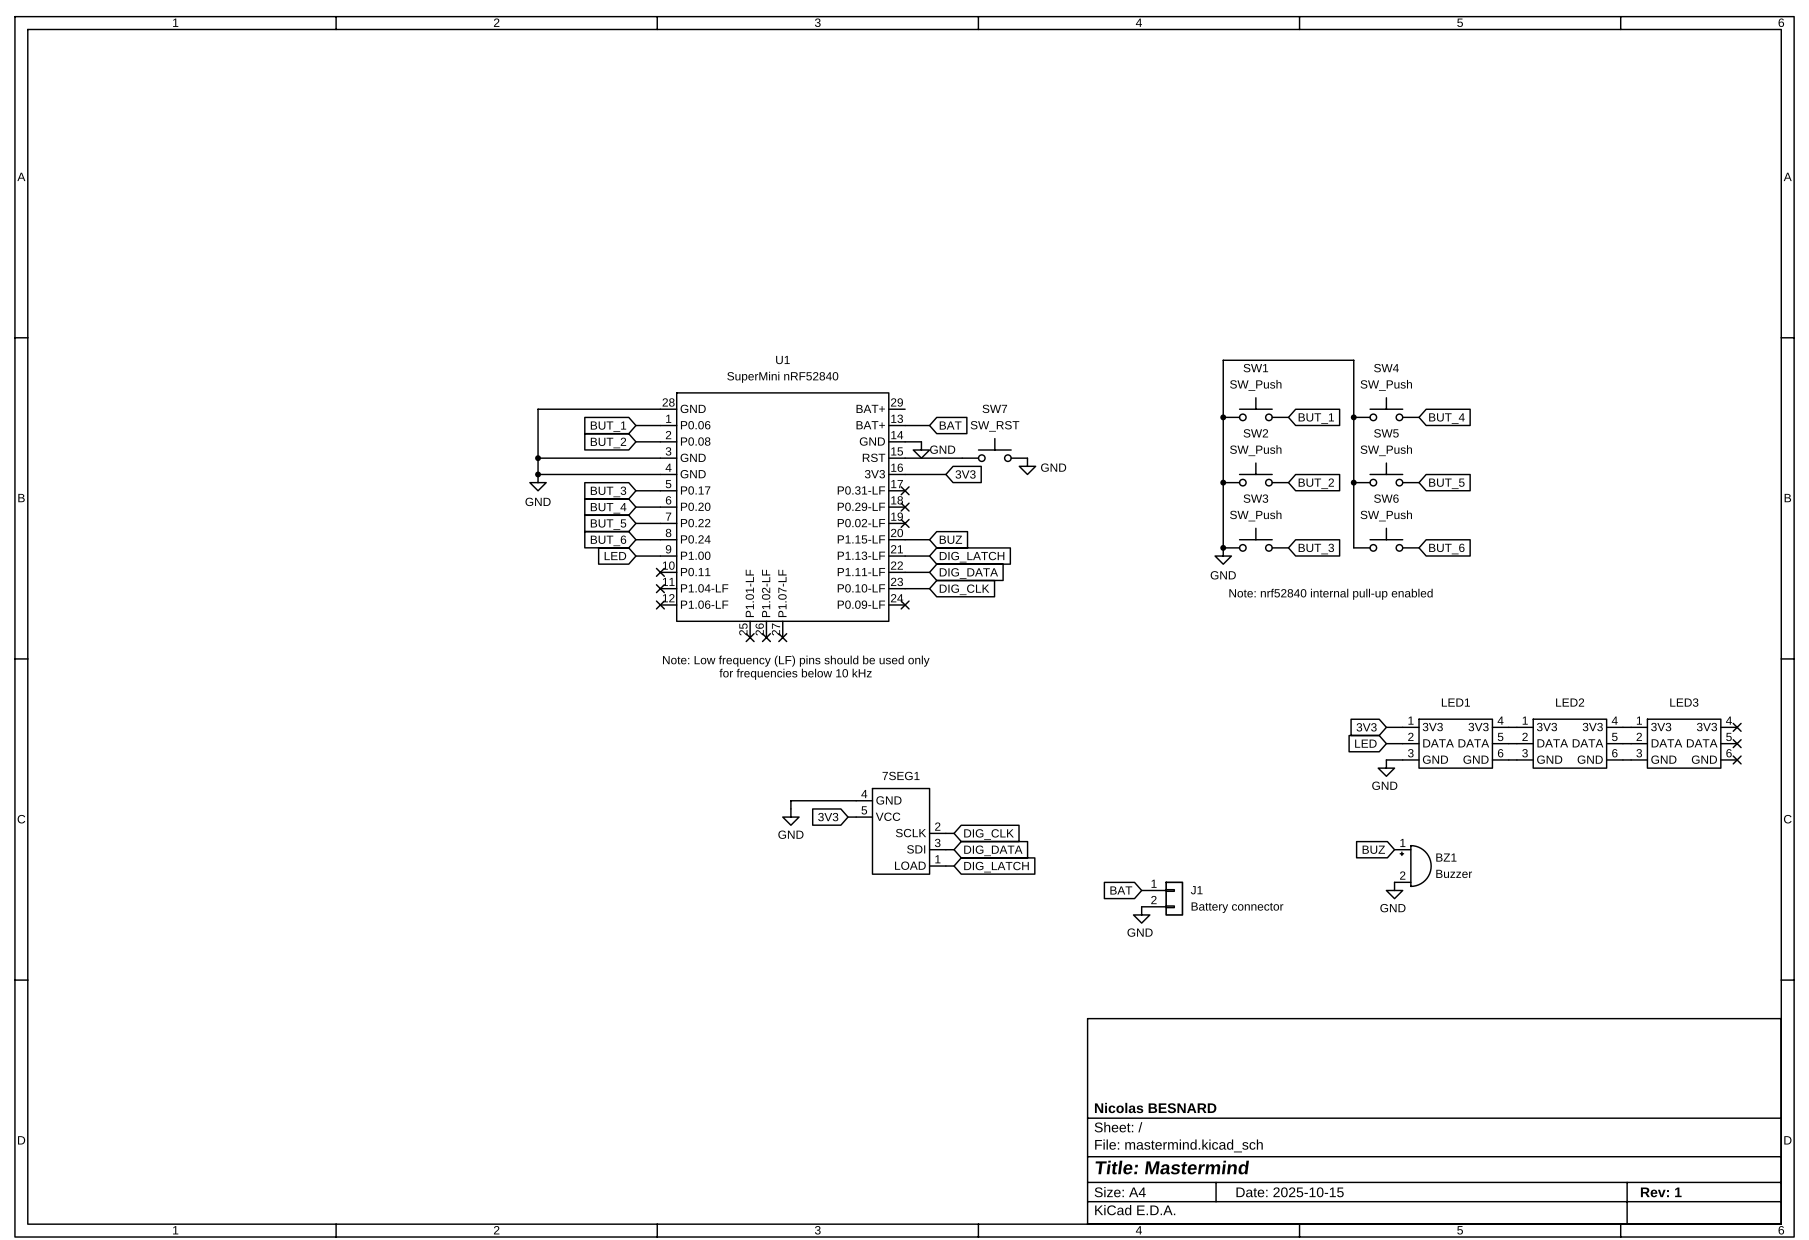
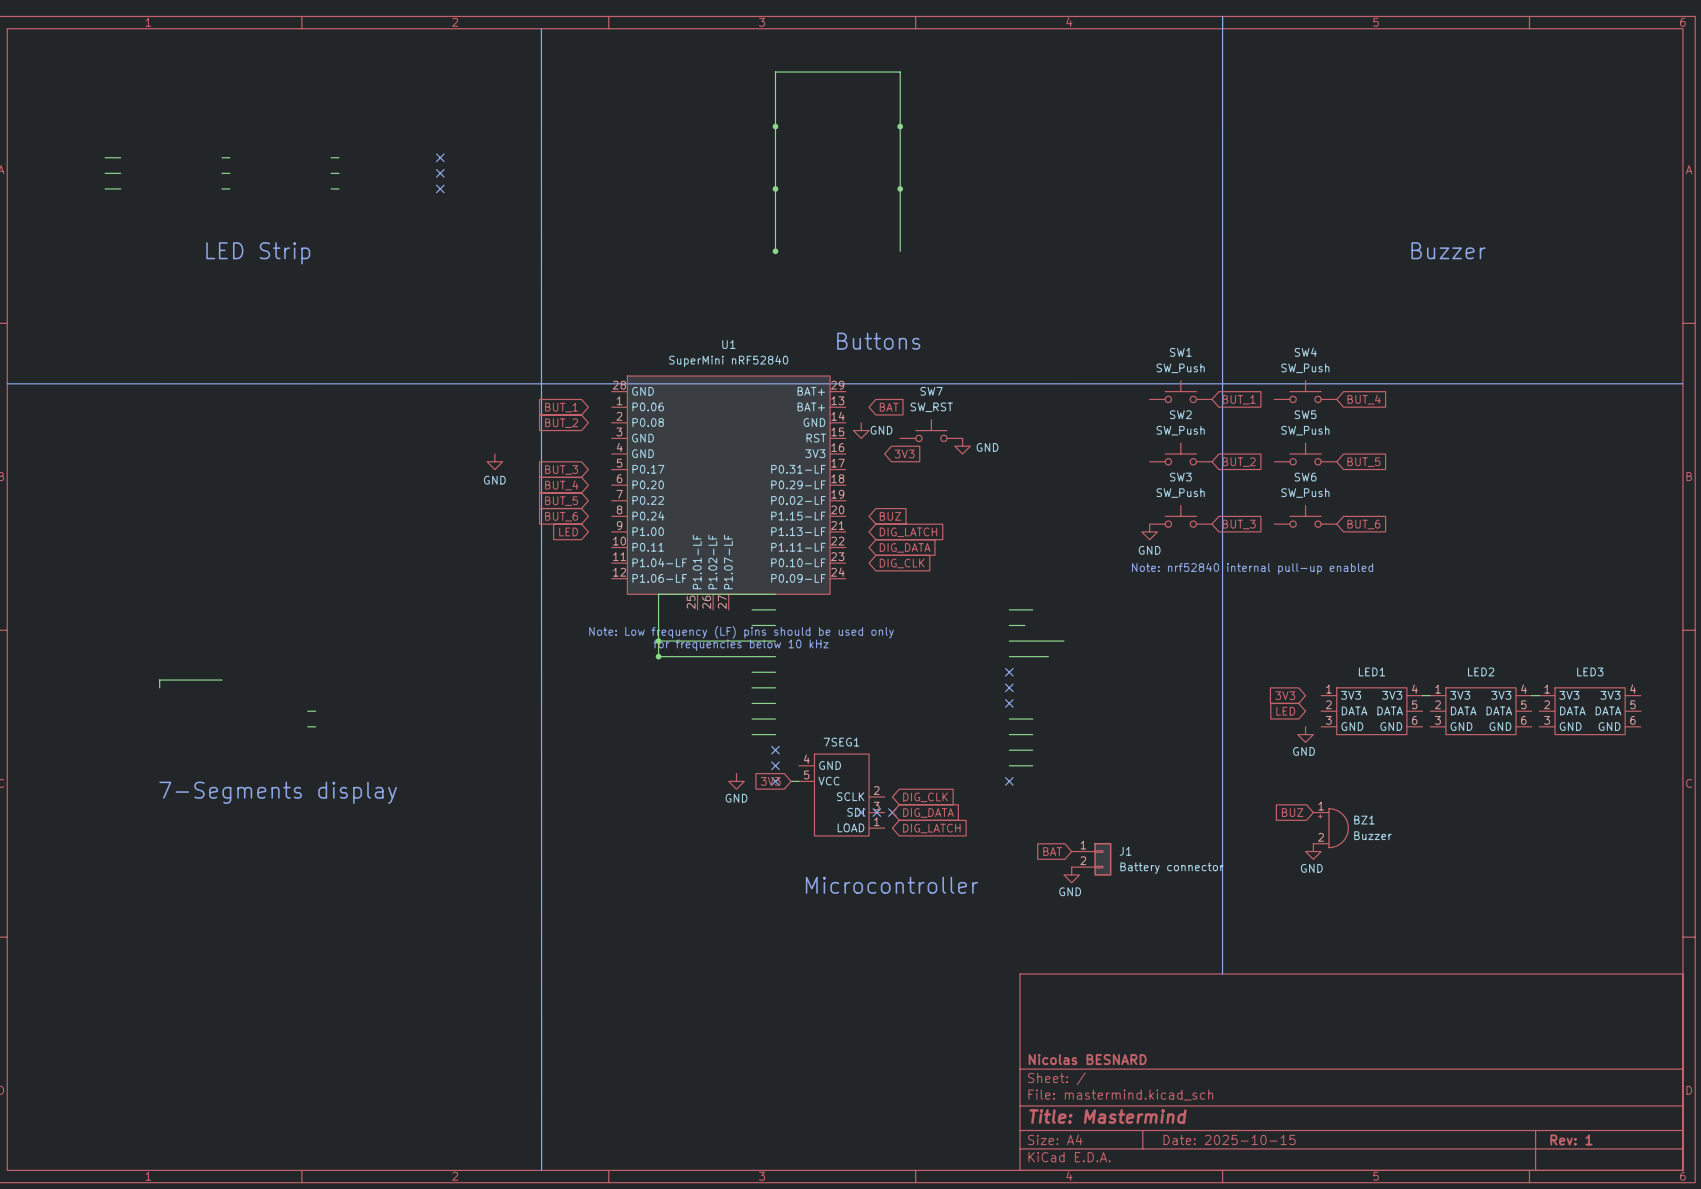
line: none -> (1222, 16) (1222, 974)
line: none -> (541, 28) (541, 1170)
junction: none -> (775, 126)
junction: none -> (900, 126)
wire: none -> (105, 157) (120, 157)
wire: none -> (222, 157) (229, 157)
wire: none -> (331, 157) (338, 157)
no-connect mark: none -> (440, 157)
wire: none -> (105, 173) (120, 173)
wire: none -> (222, 173) (229, 173)
wire: none -> (331, 173) (338, 173)
no-connect mark: none -> (440, 173)
wire: none -> (105, 188) (120, 188)
wire: none -> (222, 188) (229, 188)
wire: none -> (331, 188) (338, 188)
no-connect mark: none -> (440, 188)
junction: none -> (775, 188)
junction: none -> (900, 188)
text: none -> Buzzer (1448, 250)
wire: none -> (775, 251) (775, 72) (900, 72) (900, 251)
junction: none -> (775, 251)
text: none -> LED Strip (258, 253)
text: none -> Buttons (878, 341)
line: none -> (7, 383) (1682, 383)
wire: (660, 409) (538, 409) (538, 474) (660, 474) -> none
junction: (1223, 417) -> none
junction: (1353, 417) -> none
wire: (635, 425) (660, 425) -> none
wire: (905, 425) (929, 425) -> none
wire: (635, 441) (660, 441) -> none
wire: (905, 441) (921, 441) -> none
wire: (538, 458) (660, 458) -> none
junction: (538, 458) -> none
wire: (905, 458) (962, 458) -> none
junction: (538, 474) -> none
wire: (905, 474) (945, 474) -> none
junction: (1223, 482) -> none
junction: (1353, 482) -> none
wire: (635, 490) (660, 490) -> none
no-connect mark: (905, 490) -> none
wire: (635, 507) (660, 507) -> none
no-connect mark: (905, 507) -> none
wire: (635, 523) (660, 523) -> none
no-connect mark: (905, 523) -> none
wire: (635, 539) (660, 539) -> none
wire: (905, 539) (929, 539) -> none
wire: (1223, 547) (1223, 360) (1353, 360) (1353, 547) -> none
junction: (1223, 547) -> none
wire: (635, 556) (660, 556) -> none
wire: (905, 556) (929, 556) -> none
no-connect mark: (660, 572) -> none
wire: (905, 572) (929, 572) -> (752, 609) (775, 609)
no-connect mark: (660, 588) -> none
wire: (905, 588) (929, 588) -> (752, 625) (775, 625)
no-connect mark: (660, 604) -> none
no-connect mark: (905, 604) -> none
wire: none -> (775, 594) (658, 594) (658, 656) (775, 656)
no-connect mark: (750, 637) -> none
no-connect mark: (766, 637) -> none
no-connect mark: (782, 637) -> none
wire: none -> (1009, 609) (1032, 609)
wire: none -> (1009, 625) (1024, 625)
wire: none -> (658, 641) (775, 641)
junction: none -> (658, 641)
wire: none -> (1009, 641) (1063, 641)
junction: none -> (658, 656)
wire: none -> (1009, 656) (1048, 656)
wire: none -> (752, 672) (775, 672)
no-connect mark: none -> (1009, 672)
wire: none -> (222, 680) (159, 680) (159, 687)
wire: none -> (752, 687) (775, 687)
no-connect mark: none -> (1009, 687)
wire: (1386, 727) (1402, 727) -> none
no-connect mark: (1737, 727) -> none
wire: none -> (752, 703) (775, 703)
no-connect mark: none -> (1009, 703)
wire: none -> (307, 711) (315, 711)
wire: (1386, 743) (1402, 743) -> none
wire: (1508, 743) (1516, 743) -> none
wire: (1622, 743) (1631, 743) -> none
no-connect mark: (1737, 743) -> none
wire: none -> (752, 719) (775, 719)
wire: none -> (1009, 719) (1032, 719)
wire: none -> (307, 726) (315, 726)
wire: (1386, 759) (1402, 759) -> none
wire: (1508, 759) (1516, 759) -> none
wire: (1622, 759) (1631, 759) -> none
no-connect mark: (1737, 759) -> none
wire: none -> (752, 734) (775, 734)
wire: none -> (1009, 734) (1032, 734)
no-connect mark: none -> (775, 750)
wire: none -> (1009, 750) (1032, 750)
no-connect mark: none -> (775, 765)
wire: (856, 800) (790, 800) (790, 808) -> none
wire: none -> (1009, 765) (1032, 765)
no-connect mark: none -> (775, 781)
no-connect mark: none -> (1009, 781)
text: none -> 7-Segments display (278, 792)
wire: (945, 833) (954, 833) -> none
no-connect mark: none -> (861, 812)
no-connect mark: none -> (876, 812)
wire: (945, 849) (954, 849) -> none
no-connect mark: none -> (892, 812)
wire: (945, 866) (954, 866) -> none
text: none -> Microcontroller (891, 885)

